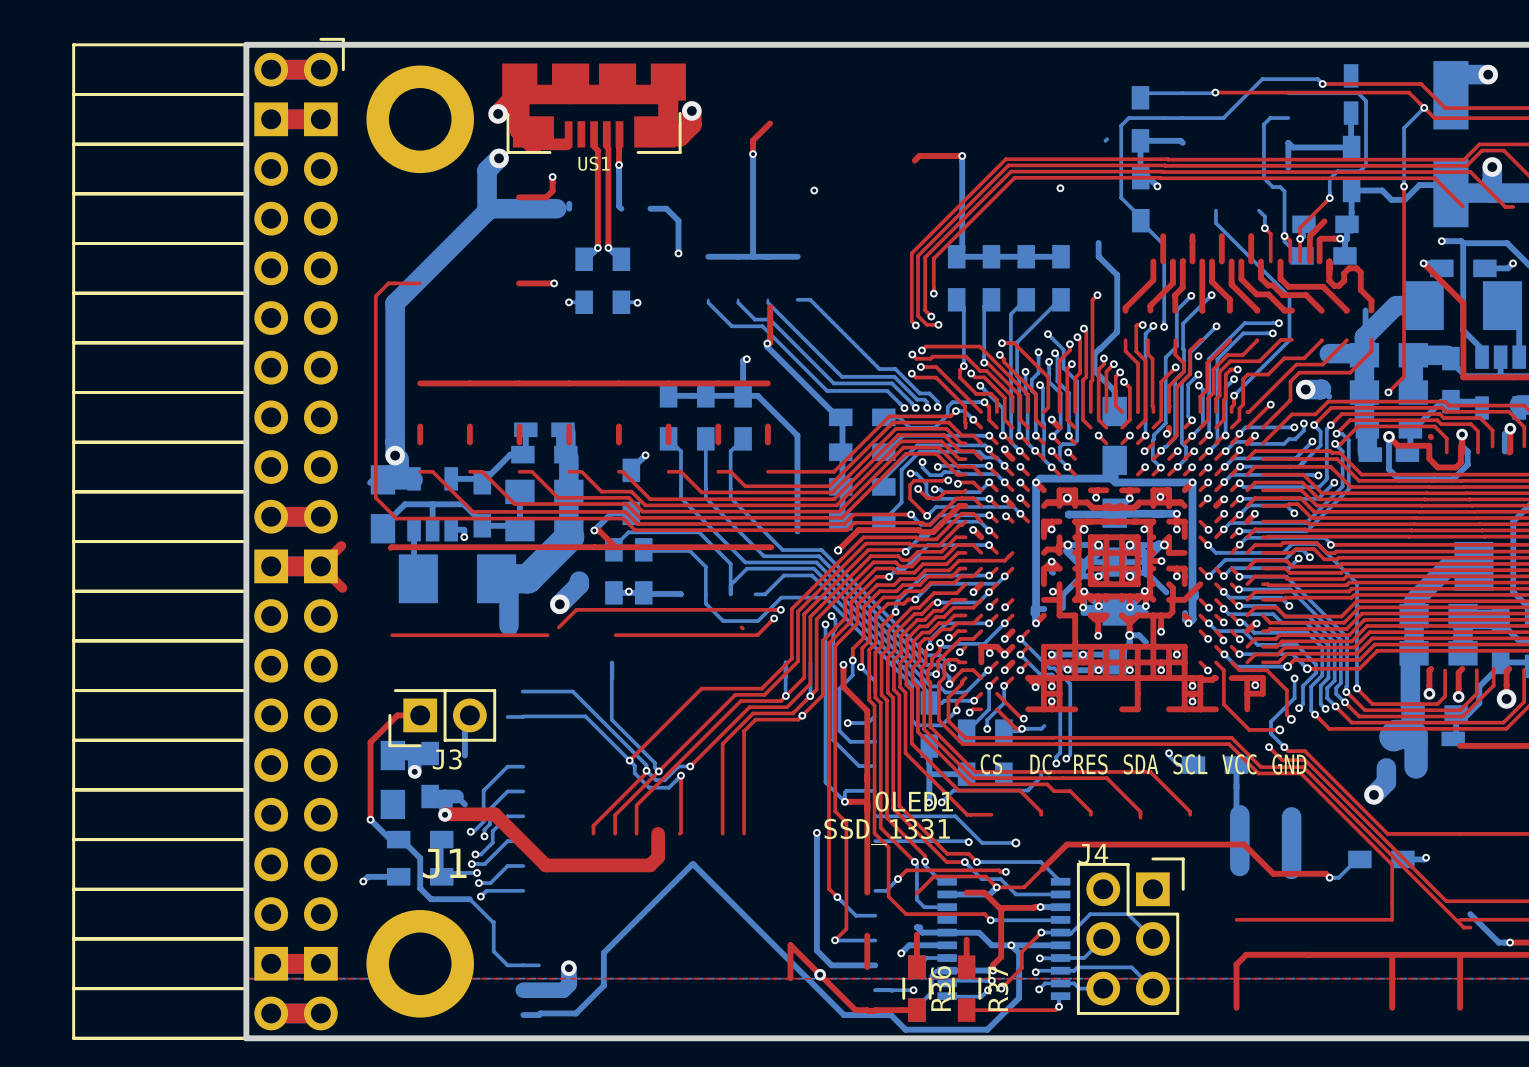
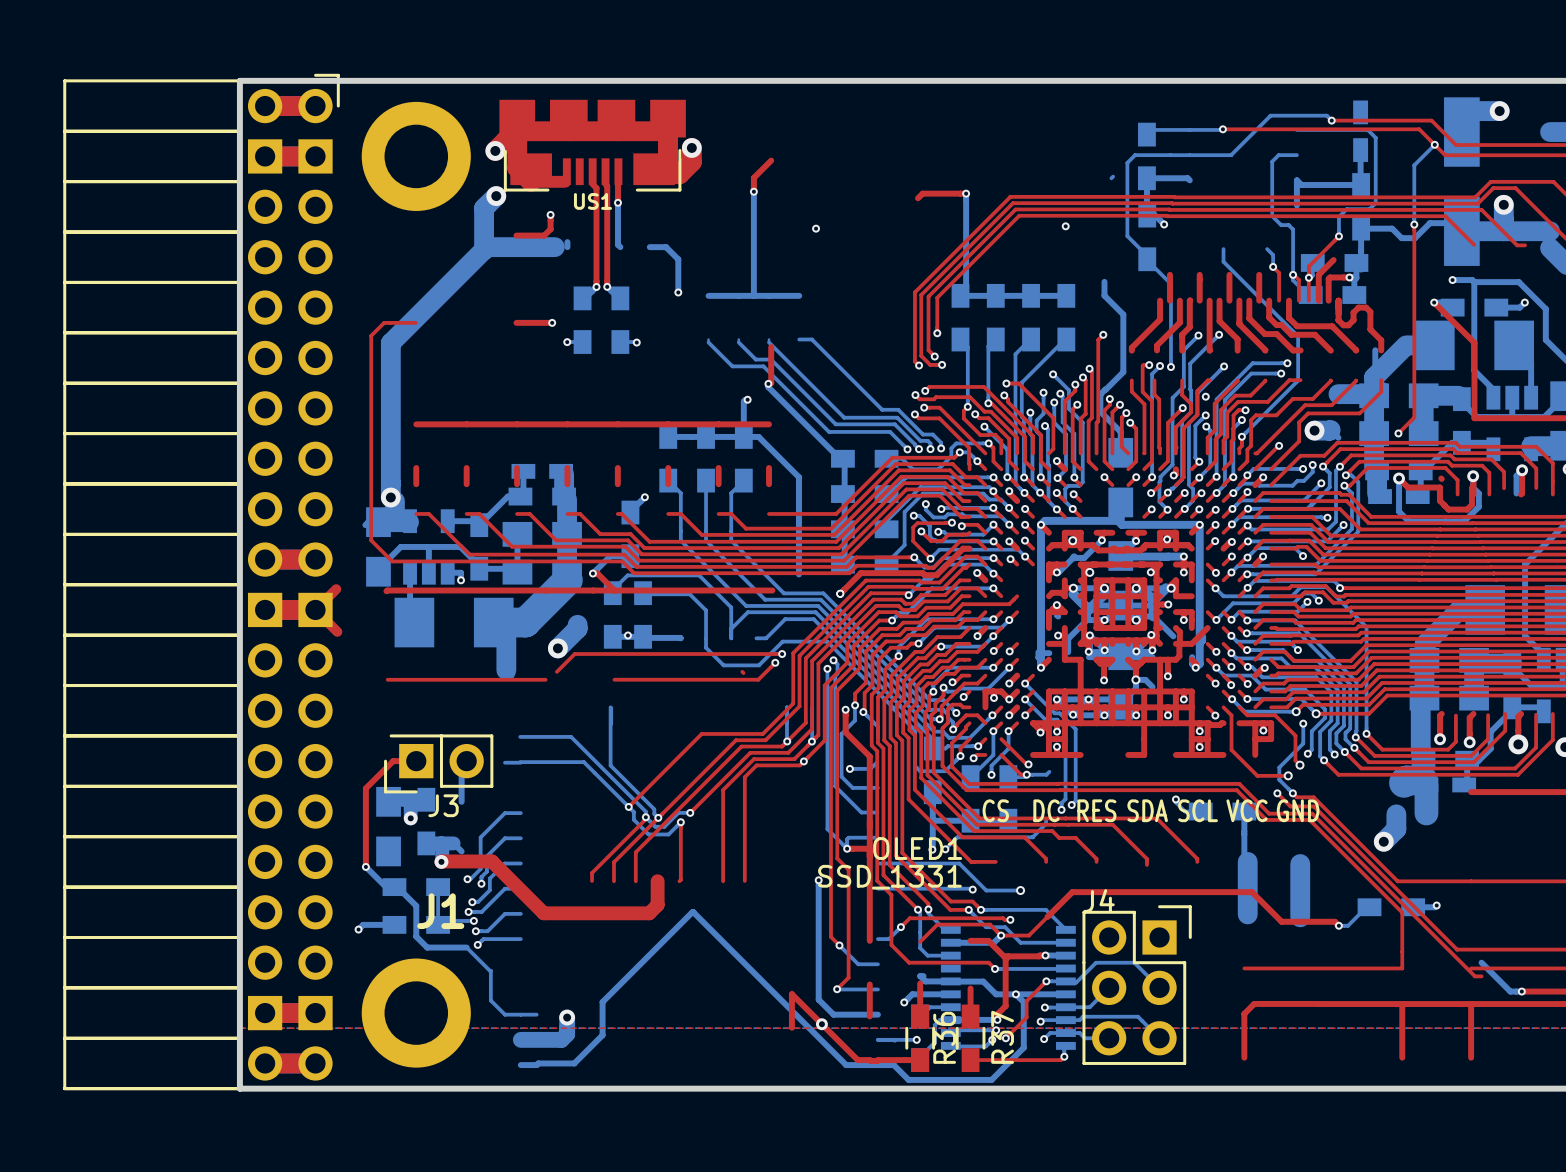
bottom track: none -> (1101, 540) (1084, 557) (1073, 557) (1056, 572)
bottom track: (1068, 514) (1113, 514) -> none

